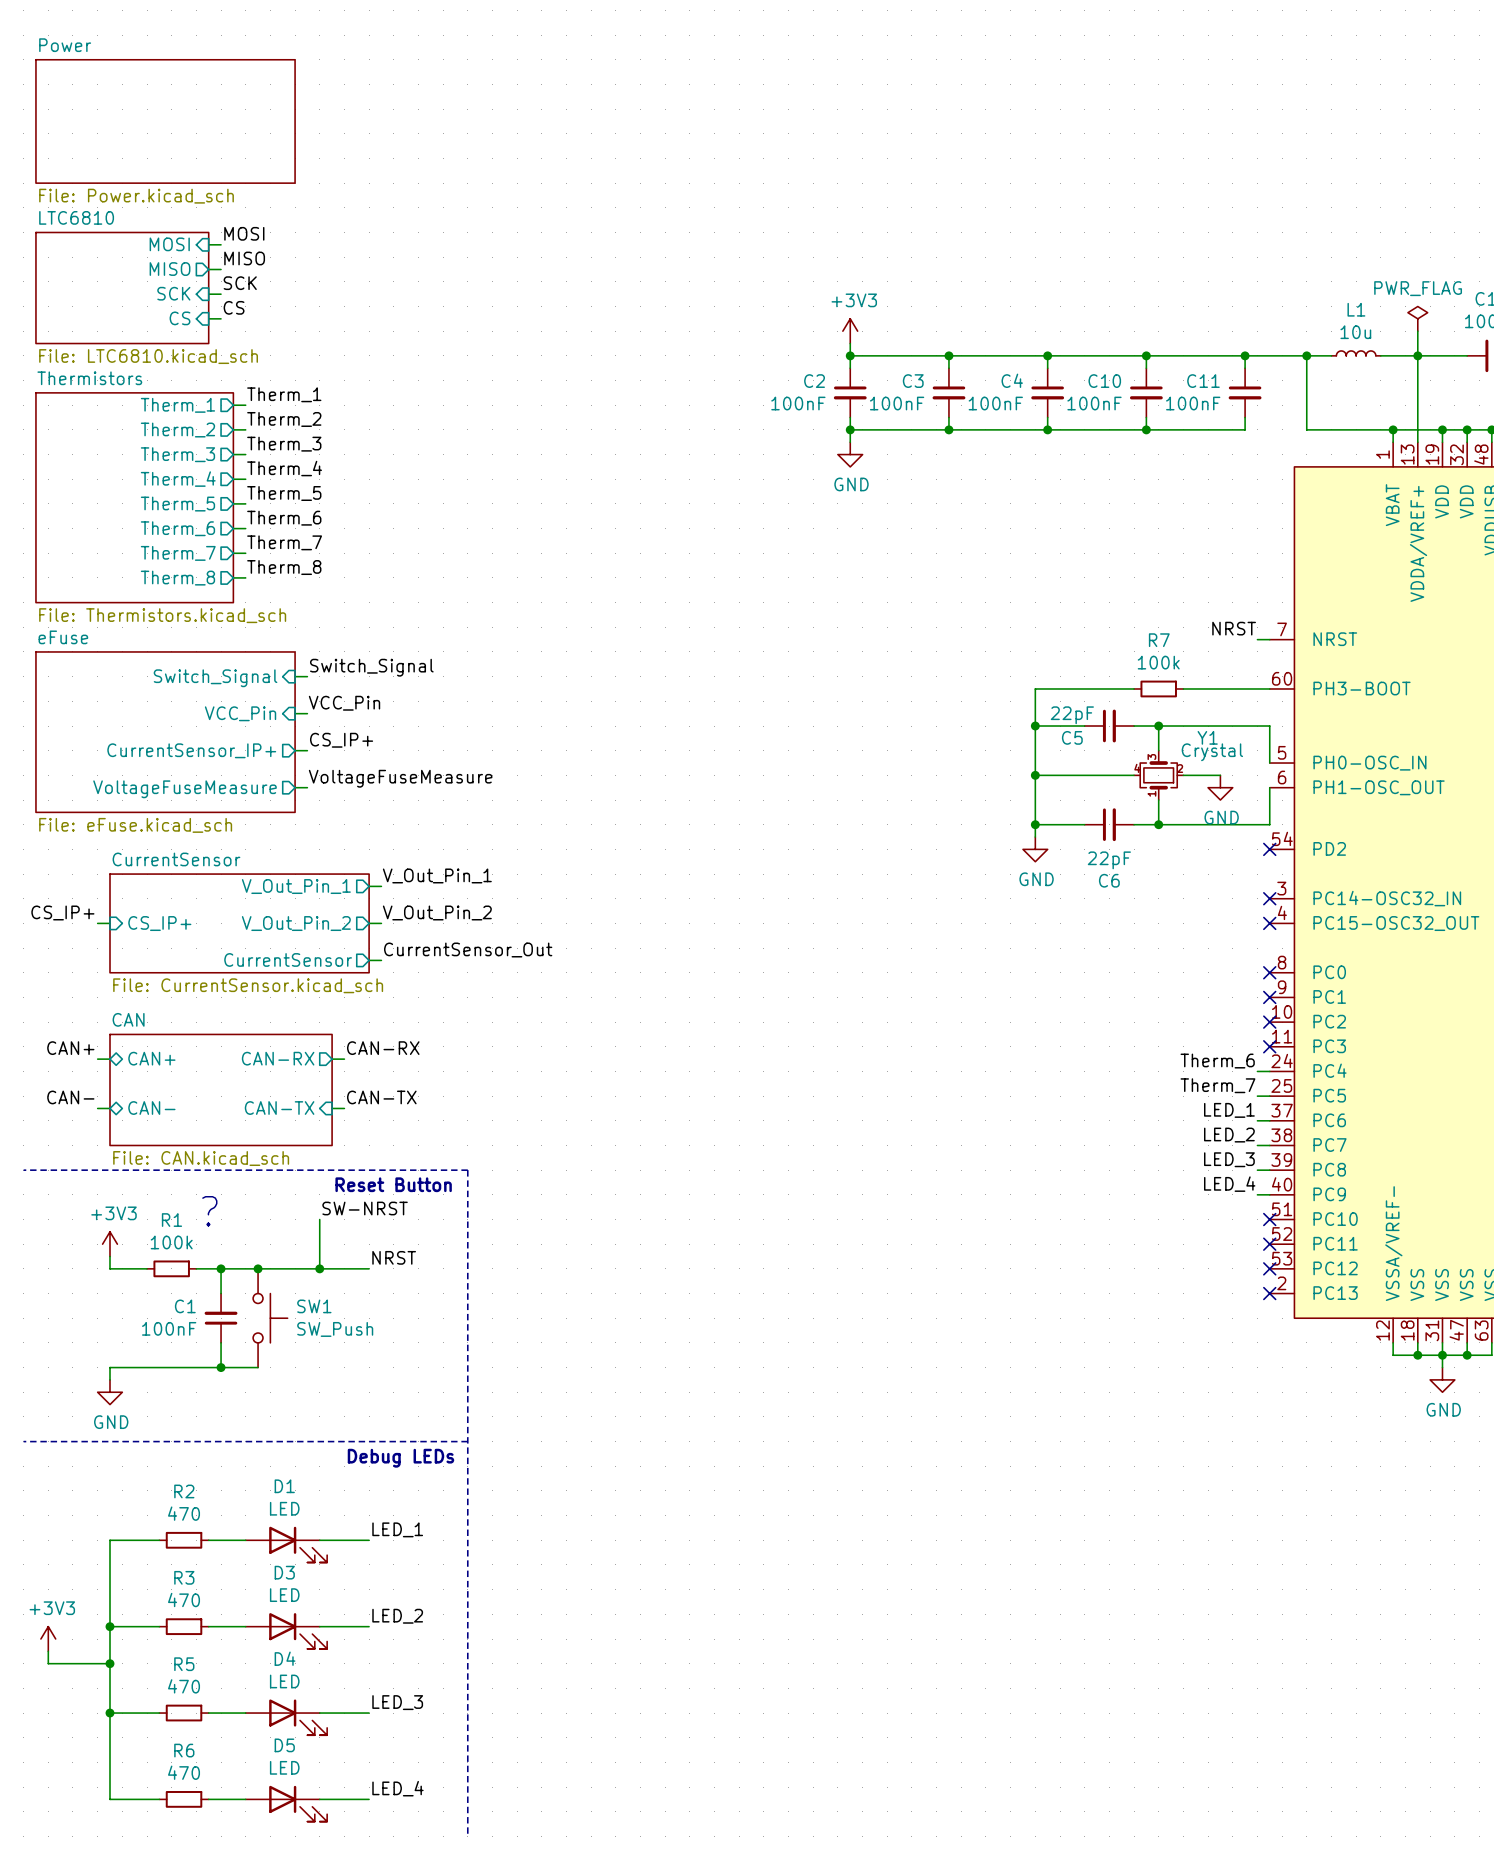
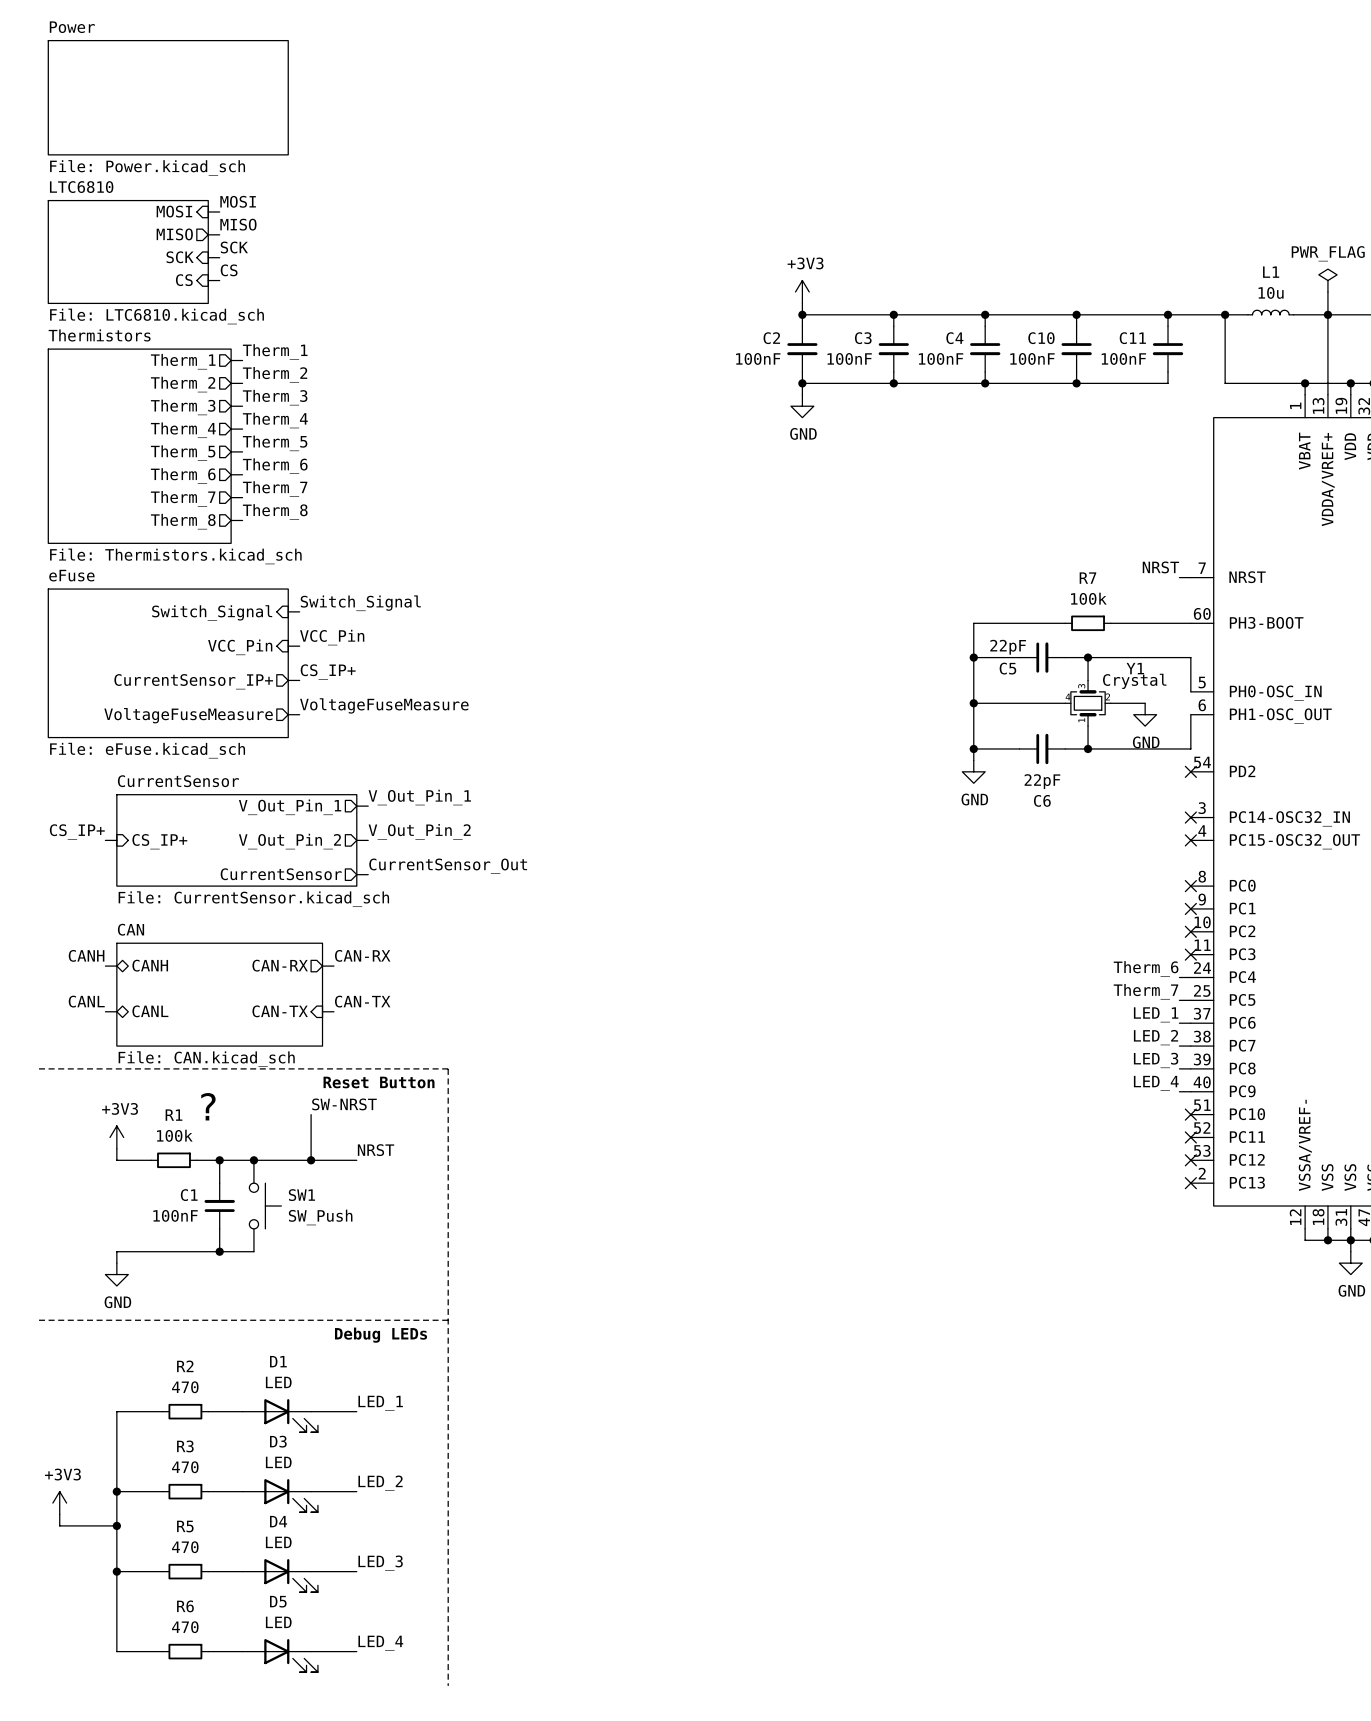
label: CAN+ (70, 1048) -> CANH (86, 955)
sheet pin: CAN+ (151, 1058) -> CANH (150, 965)
label: CAN- (70, 1097) -> CANL (86, 1001)
sheet pin: CAN- (151, 1108) -> CANL (150, 1011)

